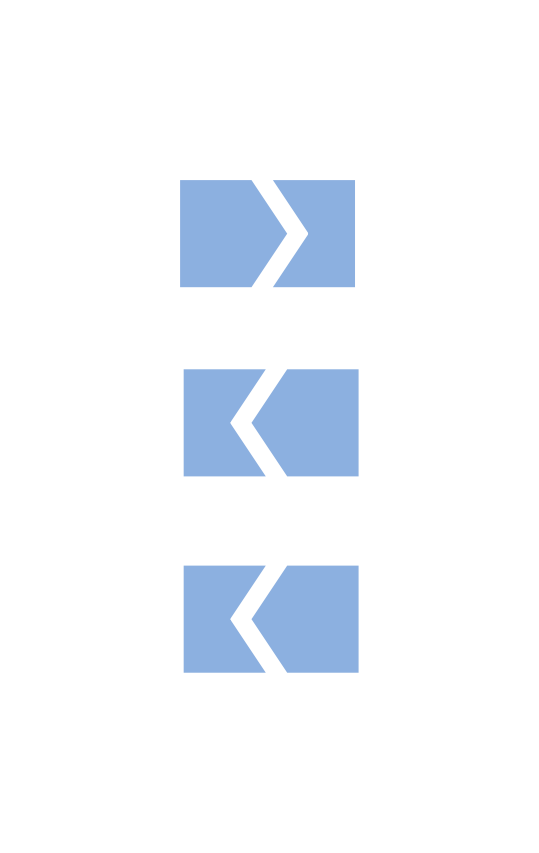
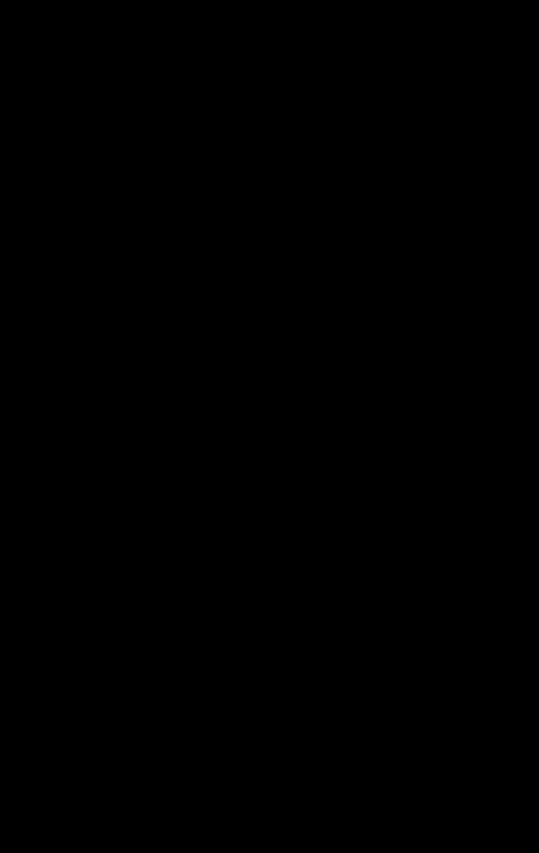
part: (267, 233) -> none
part: (271, 422) -> none
part: (271, 619) -> none

